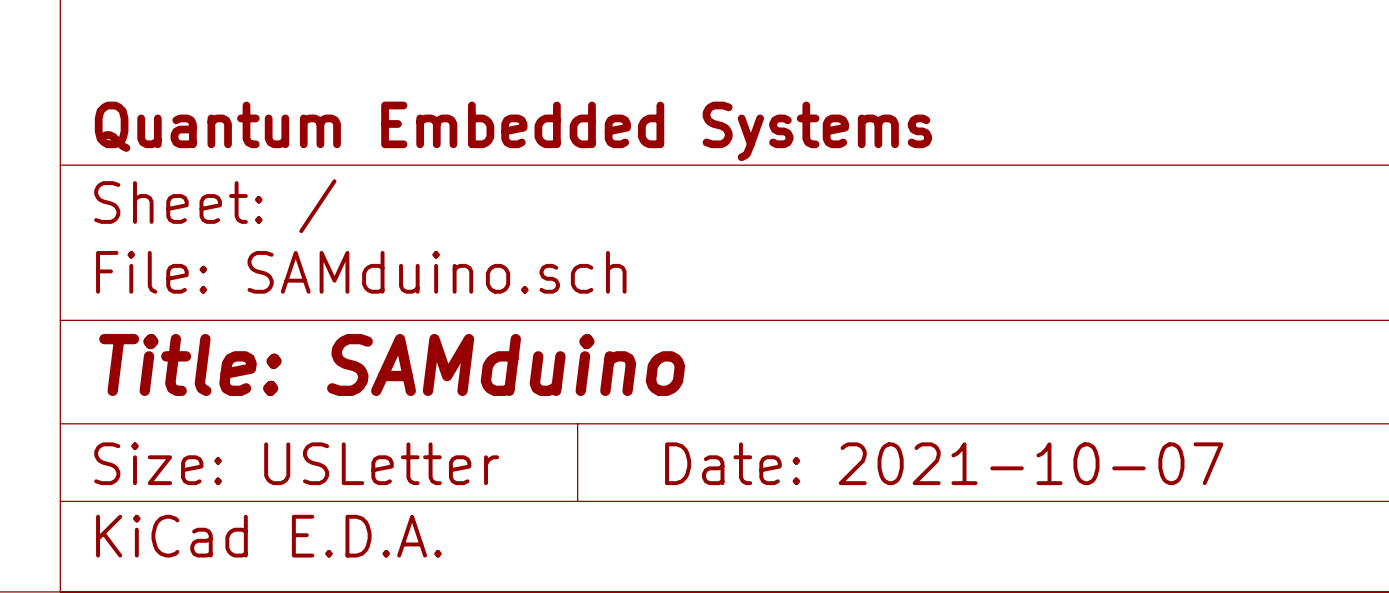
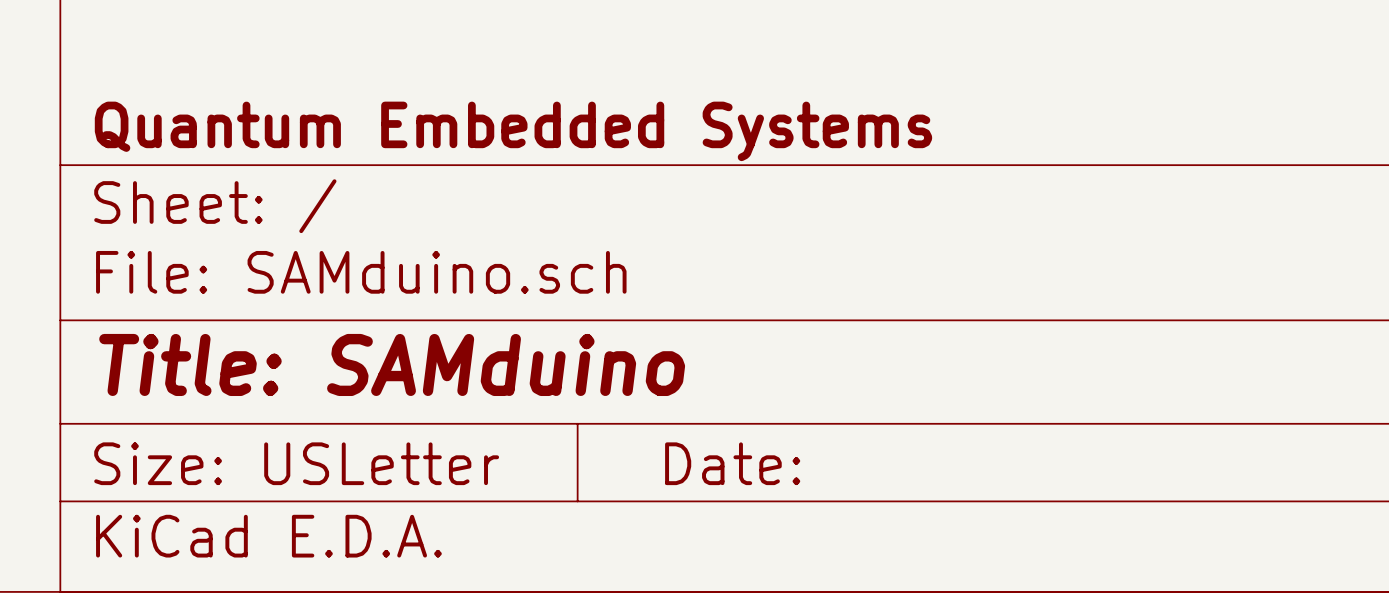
title block: Date: 2021-10-07 (944, 463) -> Date: (732, 463)

